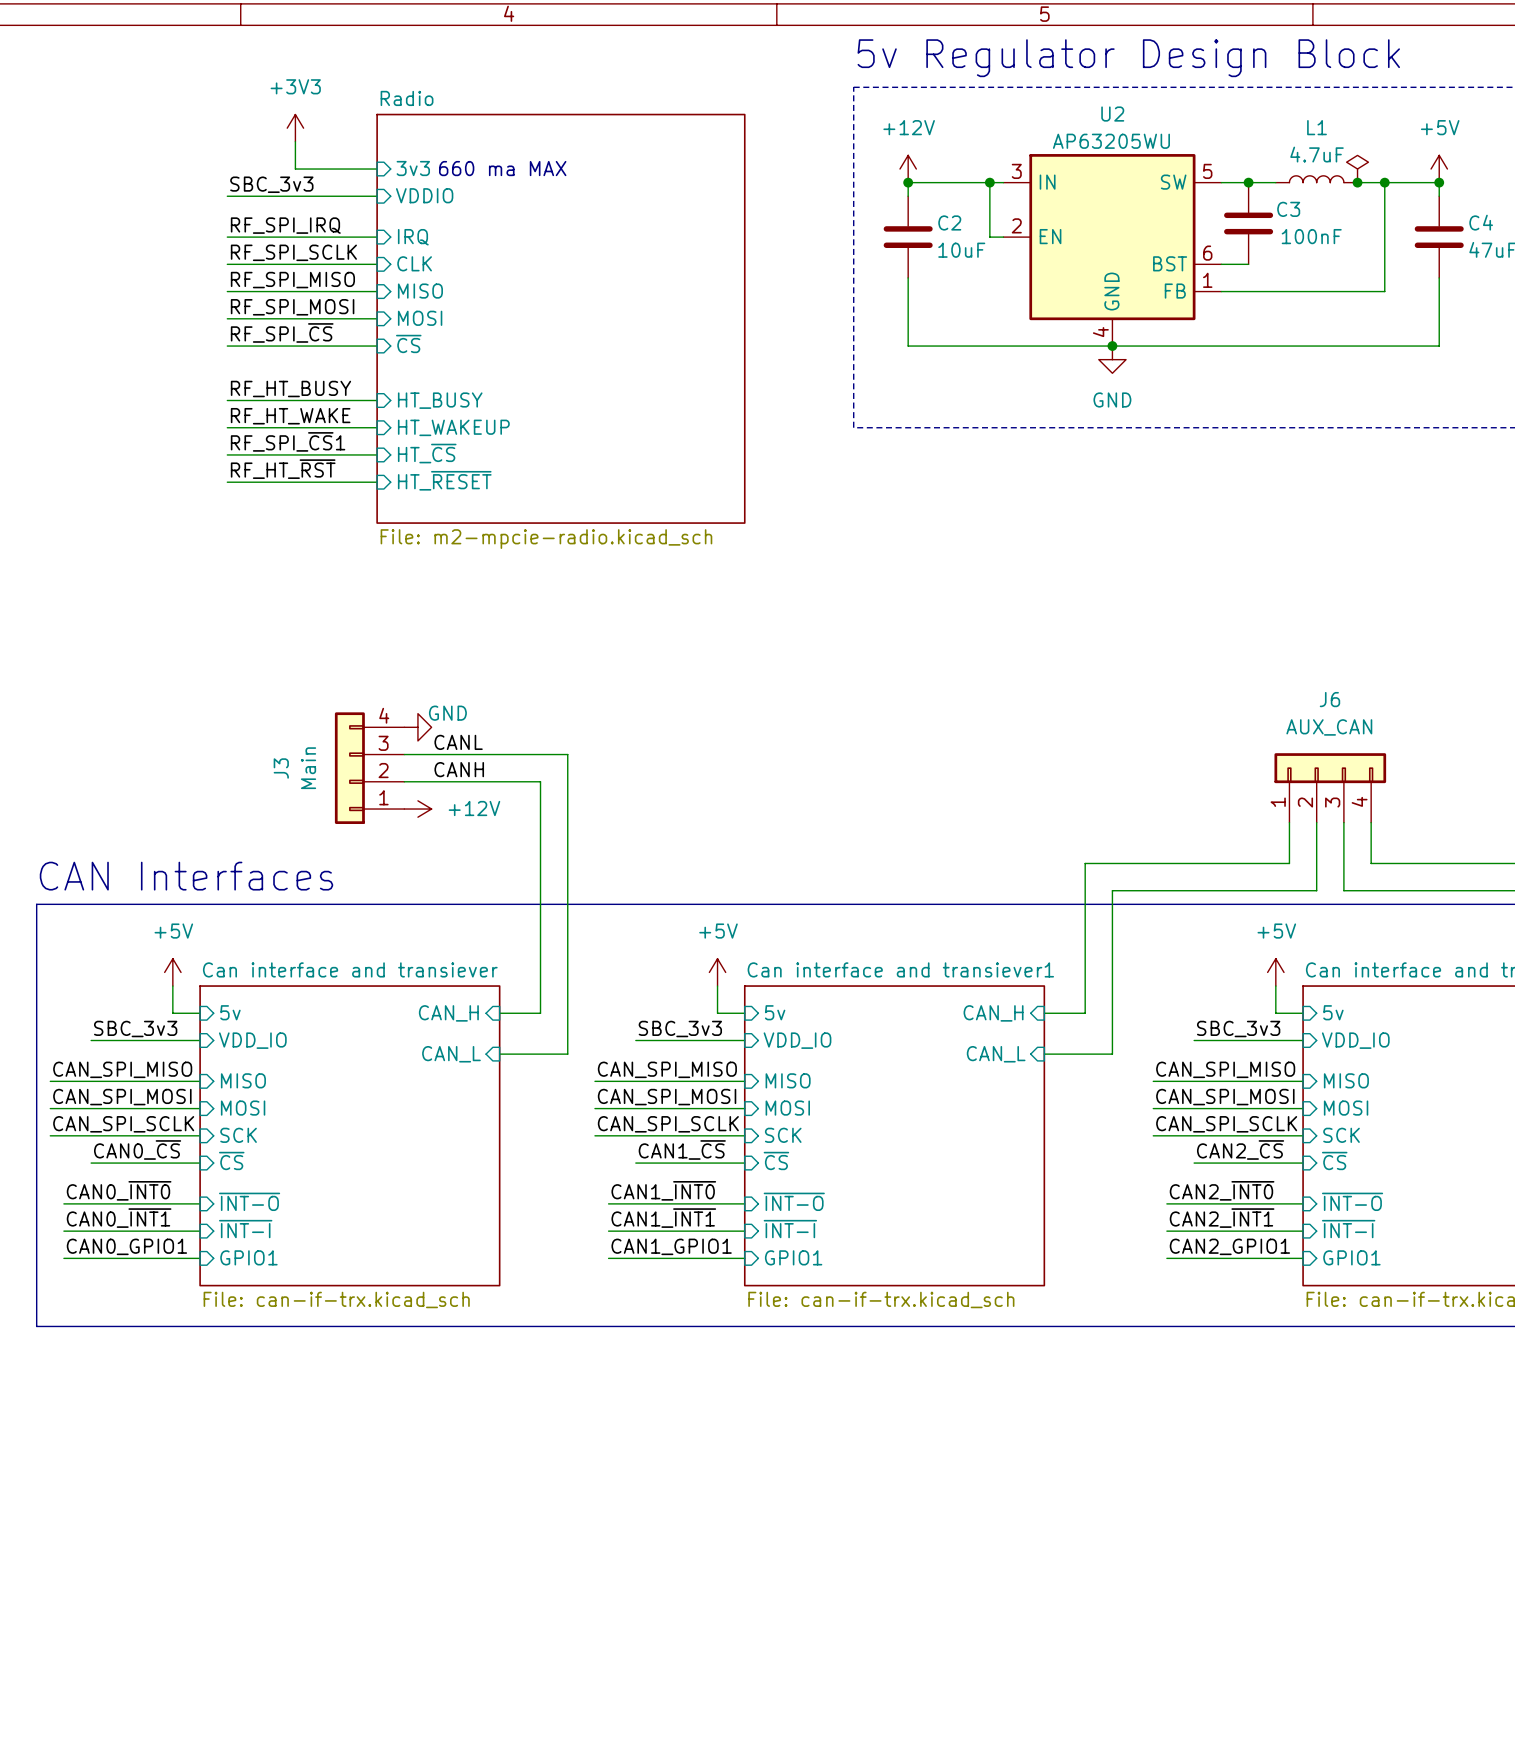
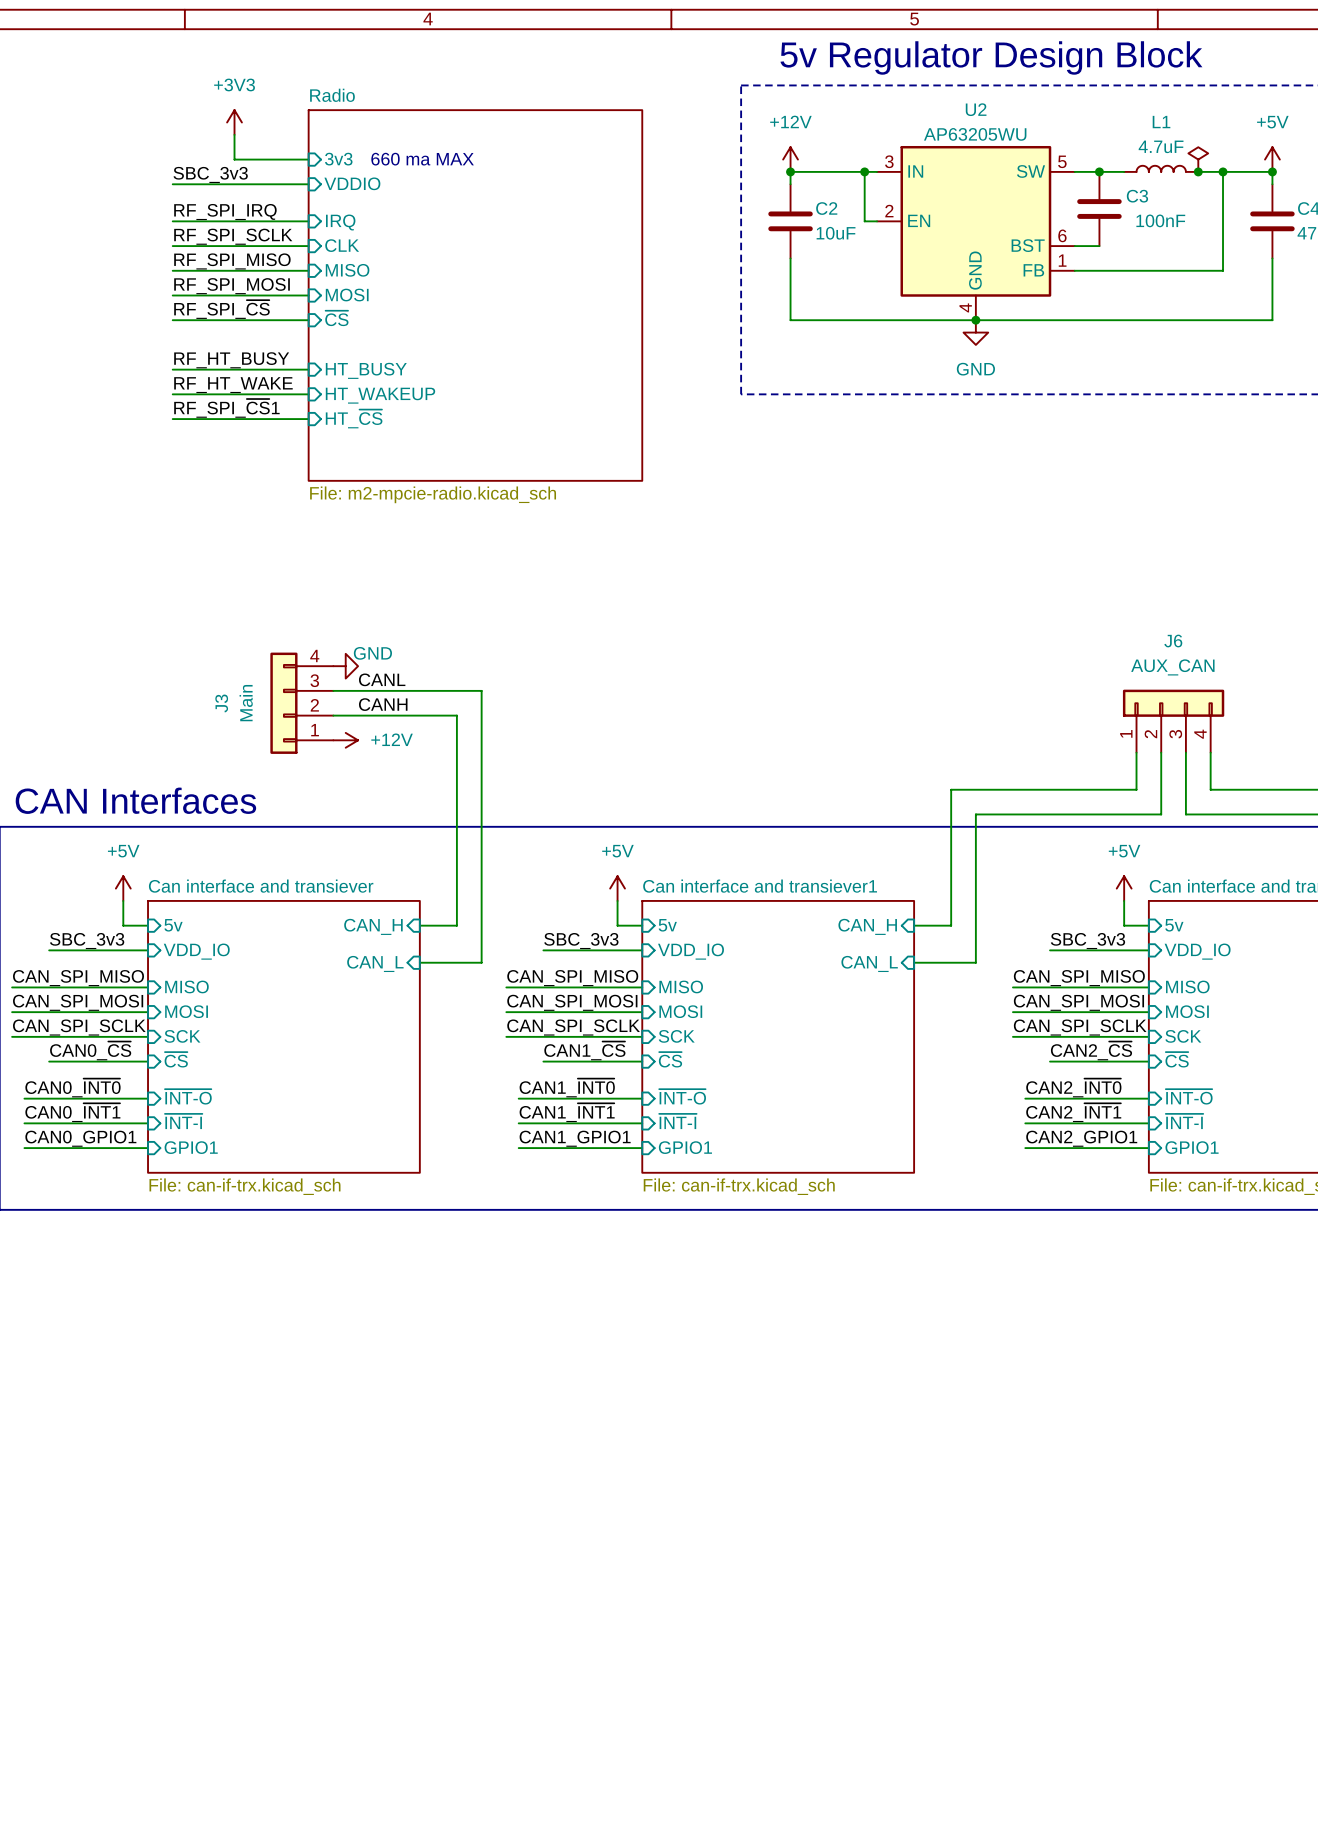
label: RF_HT_~{RST} (283, 469) -> none
sheet pin: HT_~{RESET} (444, 480) -> none
wire: (227, 482) (377, 482) -> none

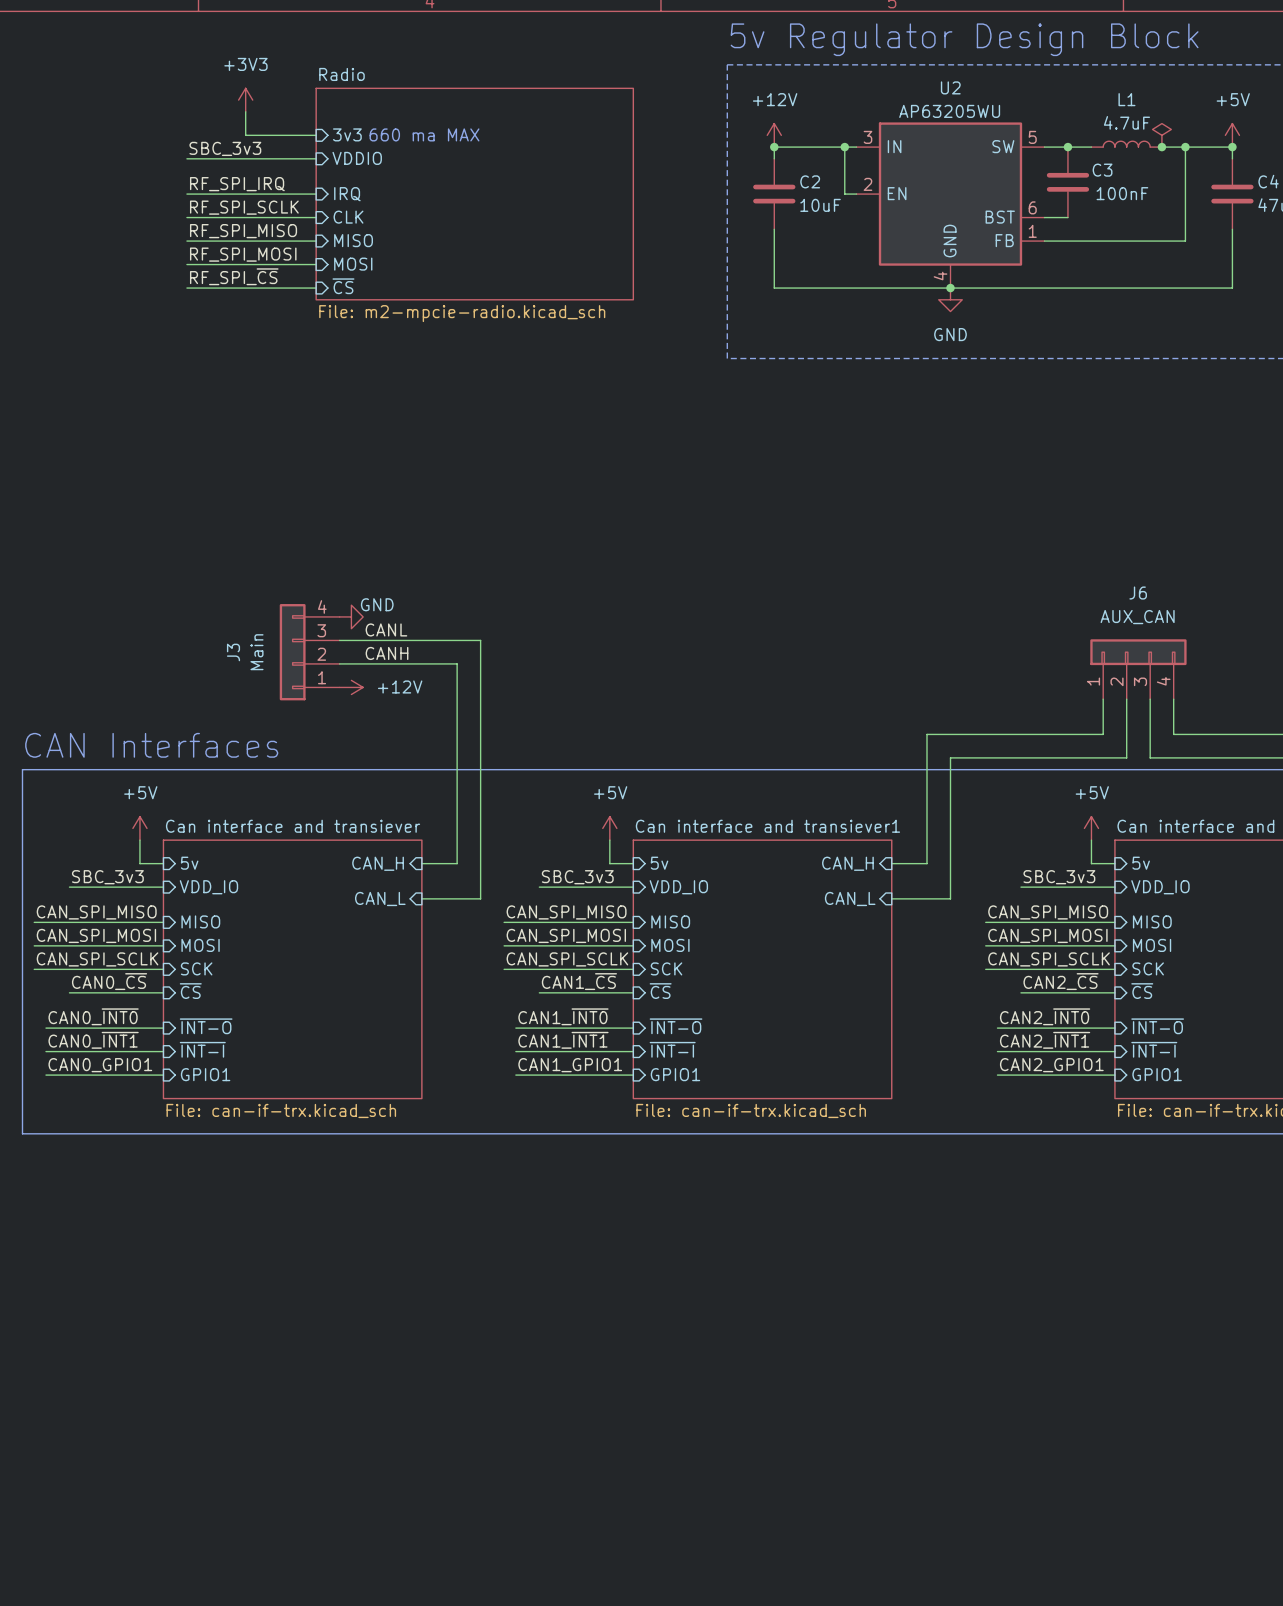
sheet Radio: none -> File: m2-mpcie-radio.kicad_sch (474, 194)
sheet Radio: File: m2-mpcie-radio.kicad_sch (475, 295) -> none
label: RF_HT_BUSY (231, 360) -> none
wire: (172, 369) (308, 369) -> none
sheet pin: HT_BUSY (366, 370) -> none
label: RF_HT_WAKE (233, 385) -> none
wire: (172, 394) (308, 394) -> none
sheet pin: HT_WAKEUP (380, 395) -> none
label: RF_SPI_~{CS}1 (226, 408) -> none
sheet pin: HT_~{CS} (354, 418) -> none
wire: (172, 419) (308, 419) -> none

